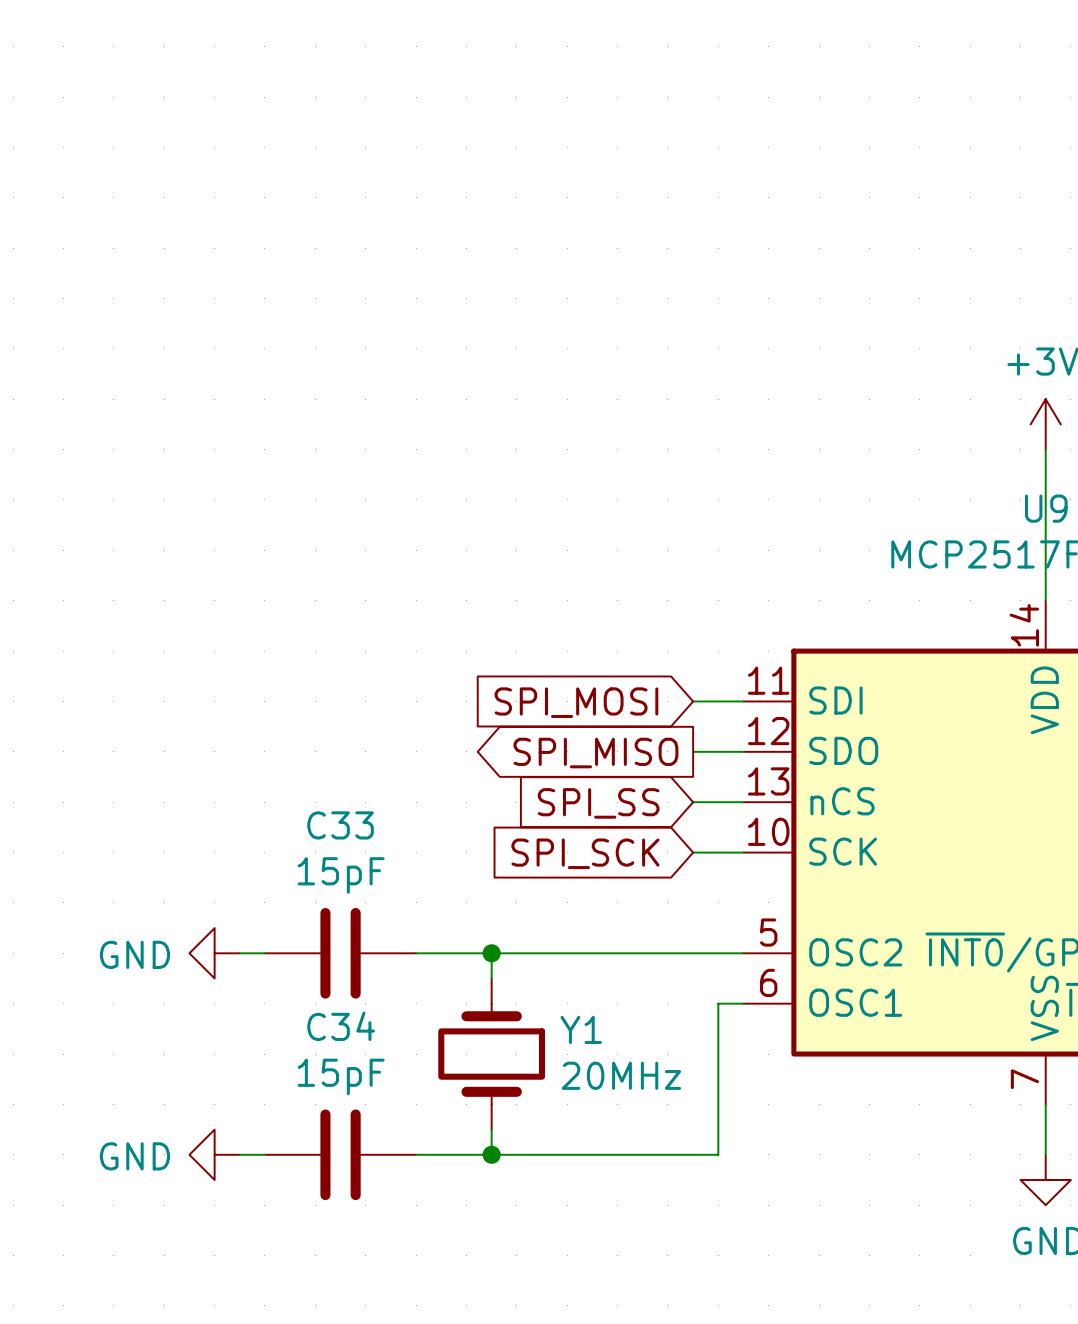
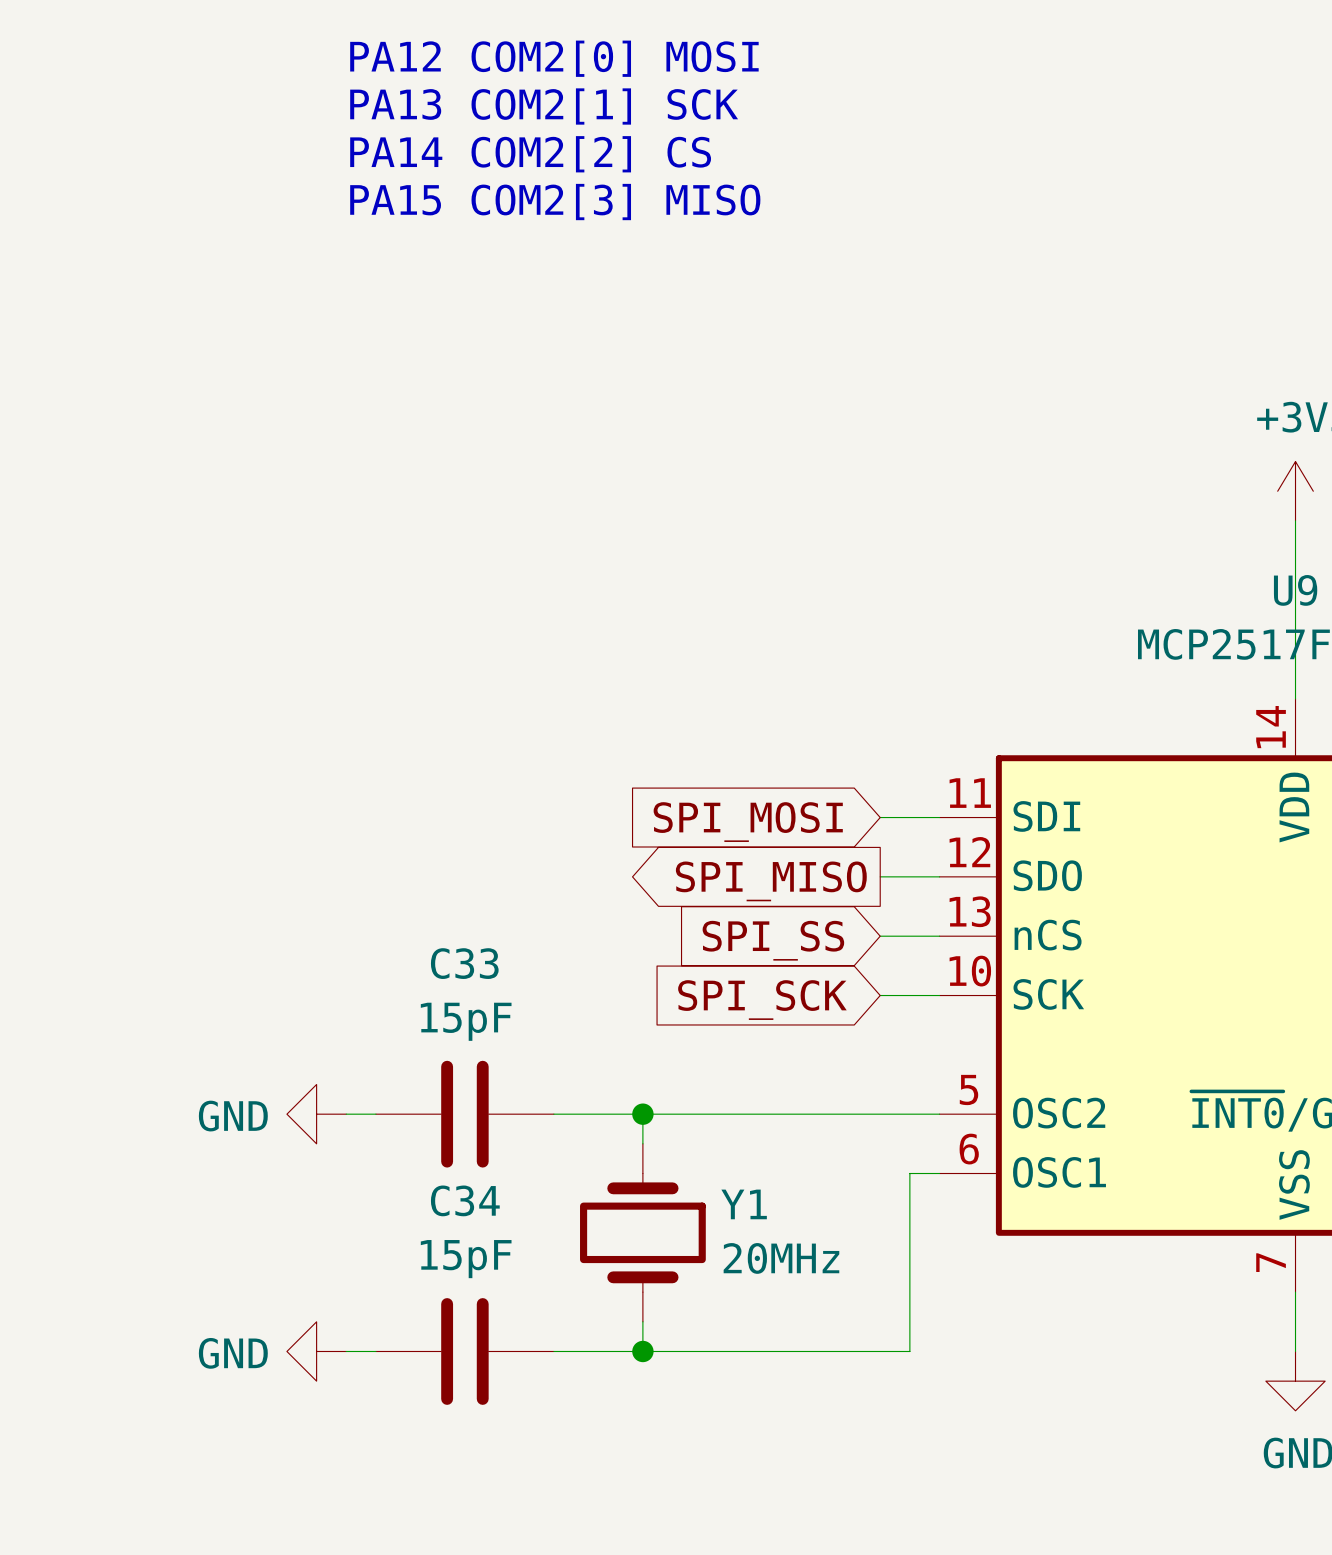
text: none -> PA12 COM2[0] MOSI (554, 58)
text: none -> PA13 COM2[1] SCK (544, 106)
text: none -> PA14 COM2[2] CS (530, 154)
text: none -> PA15 COM2[3] MISO (555, 202)

